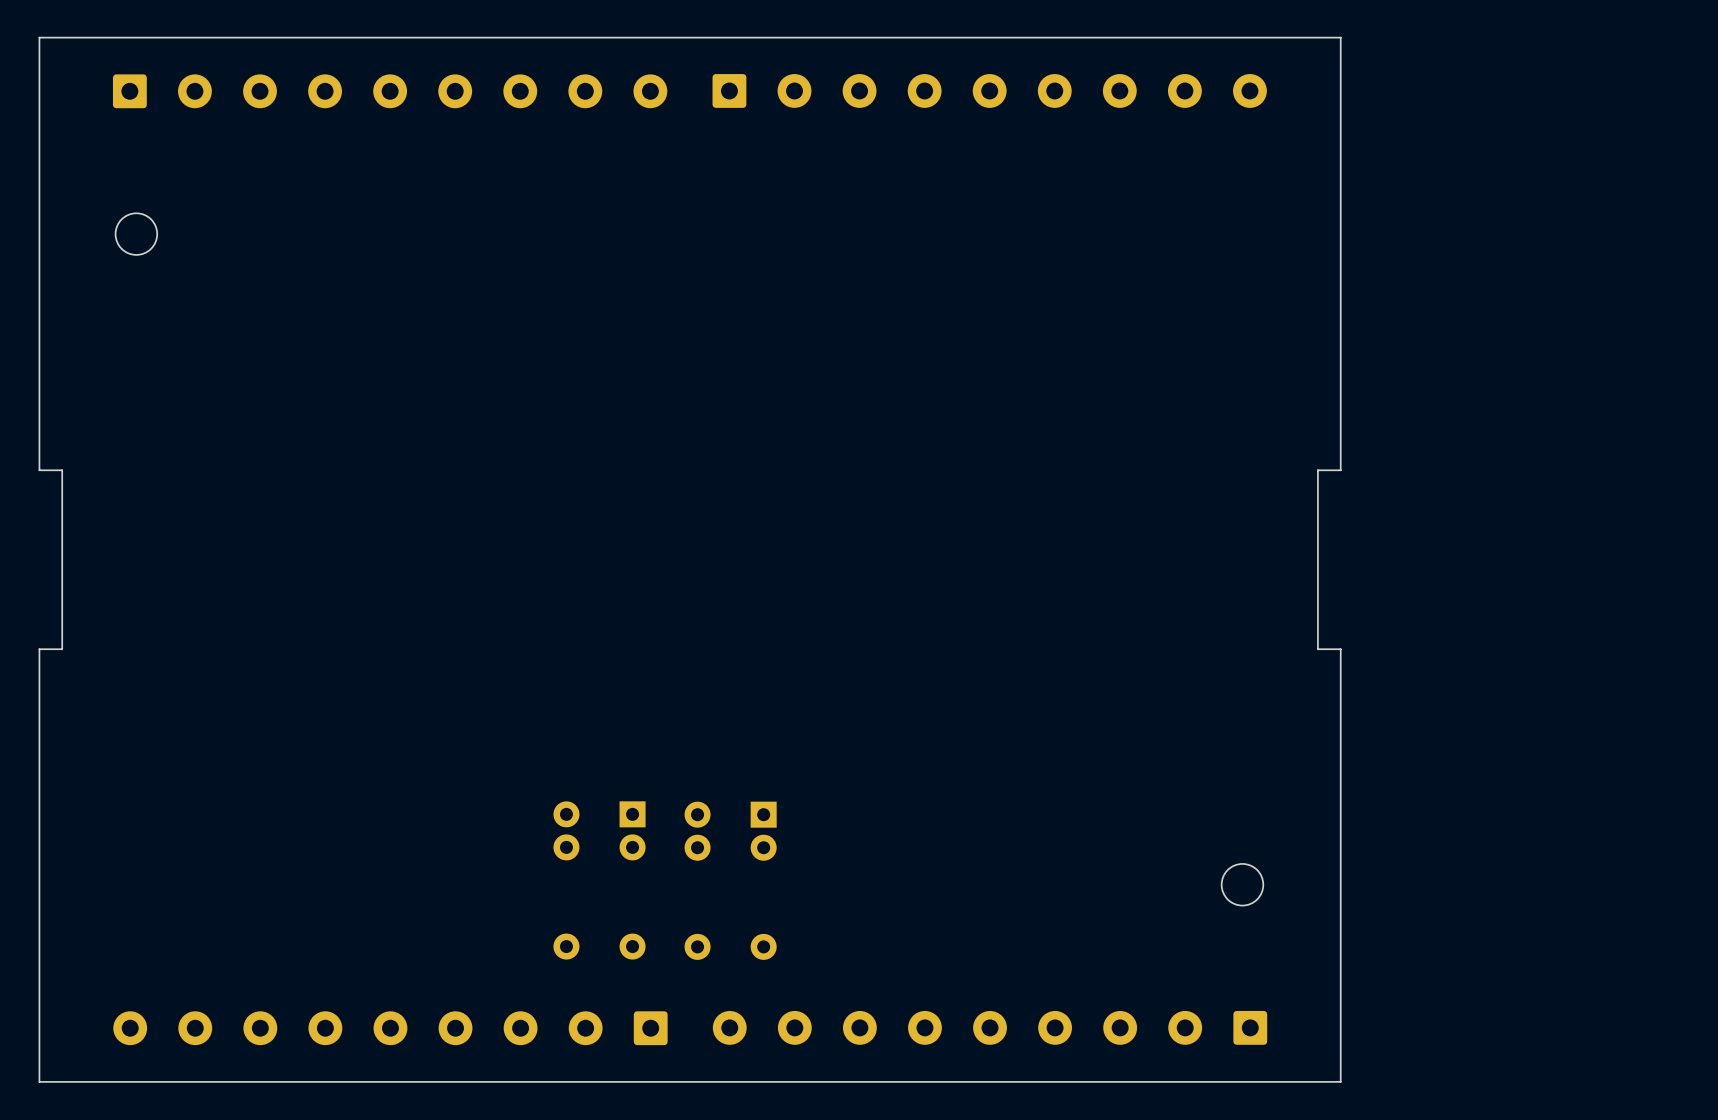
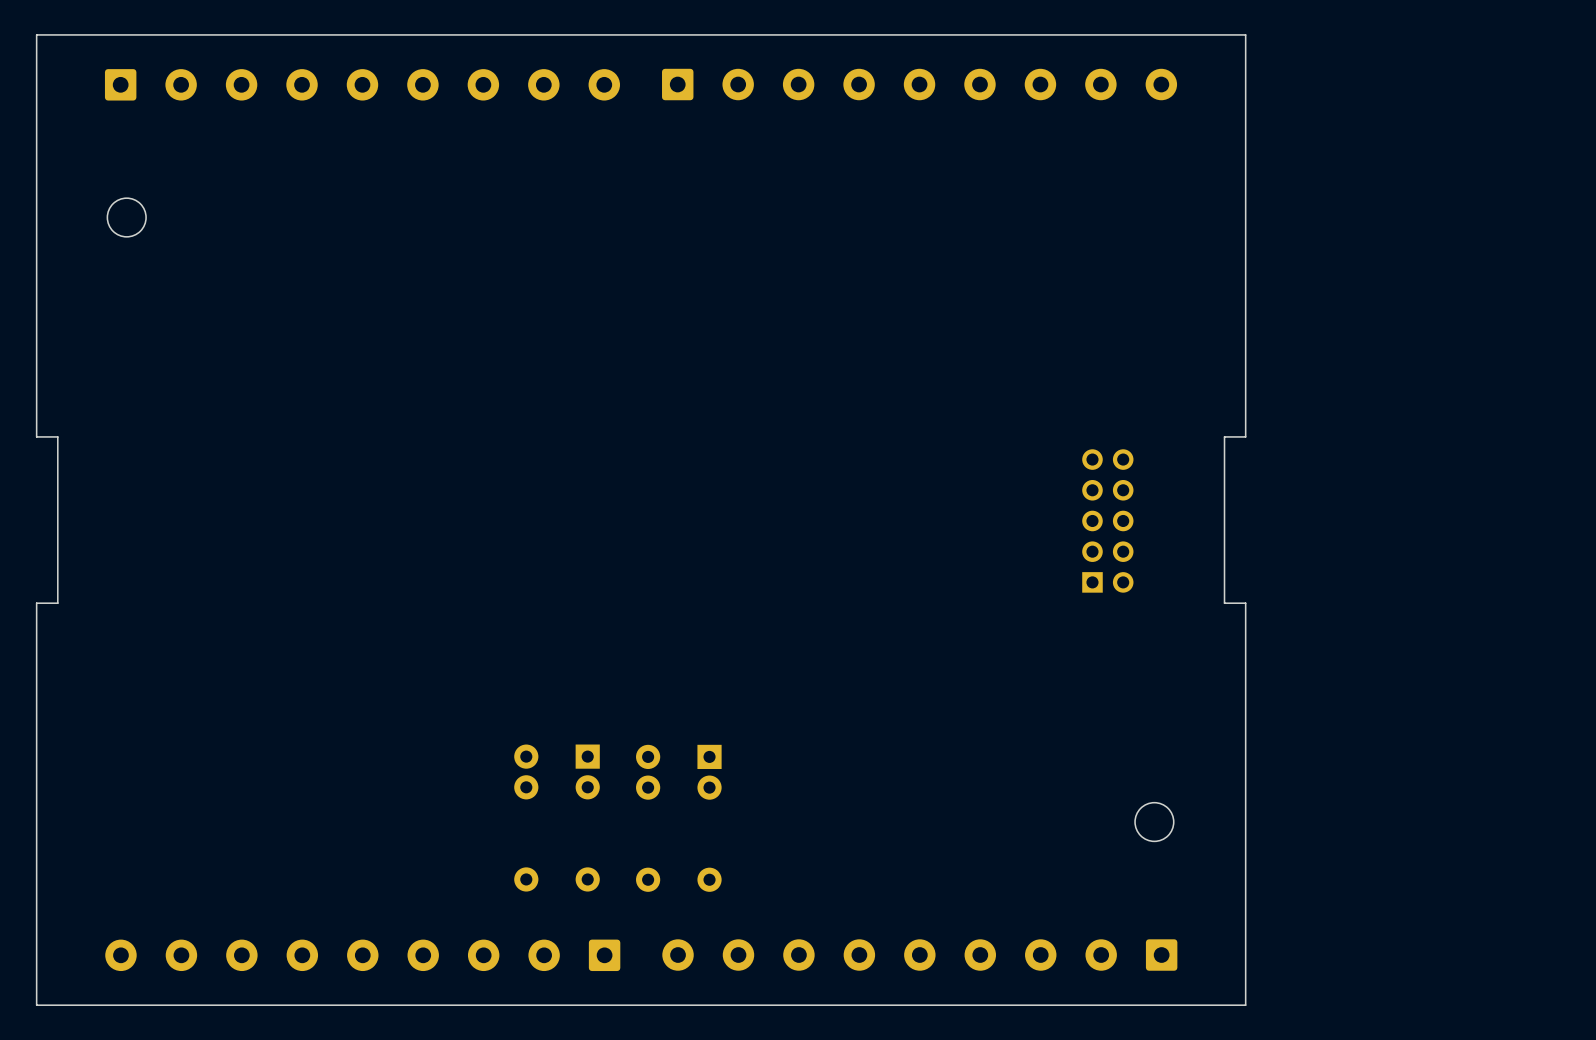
part: none -> (1107, 520)

